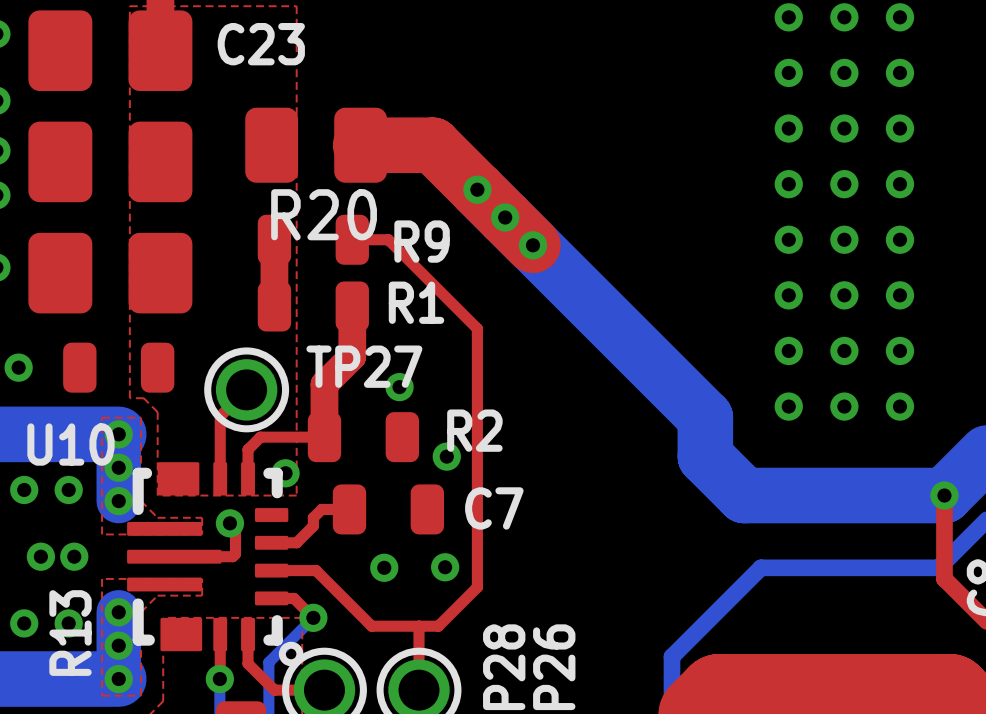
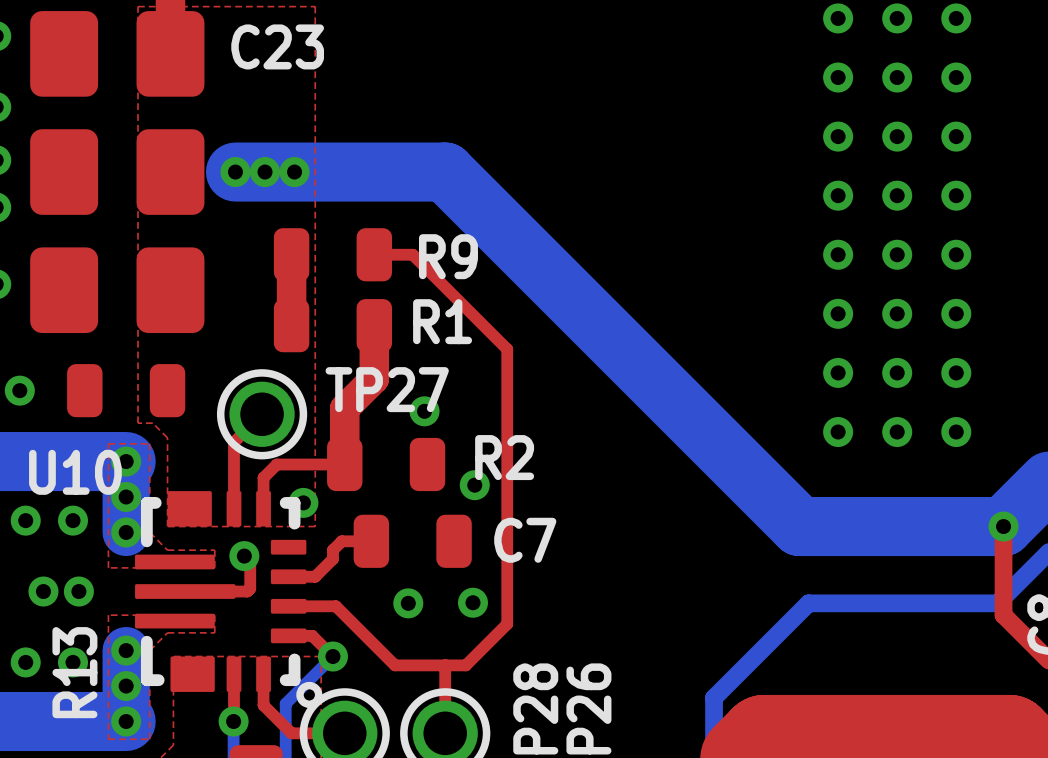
R20: (316, 145) -> none
top track: (360, 145) (432, 145) (532, 245) -> none
via: none -> (235, 172)
via: none -> (265, 172)
via: none -> (294, 172)
bottom track: (477, 189) (705, 417) (705, 456) (744, 495) (752, 495) -> (235, 172) (445, 172) (799, 526)
via: (477, 189) -> none
via: (505, 217) -> none
via: (532, 245) -> none

